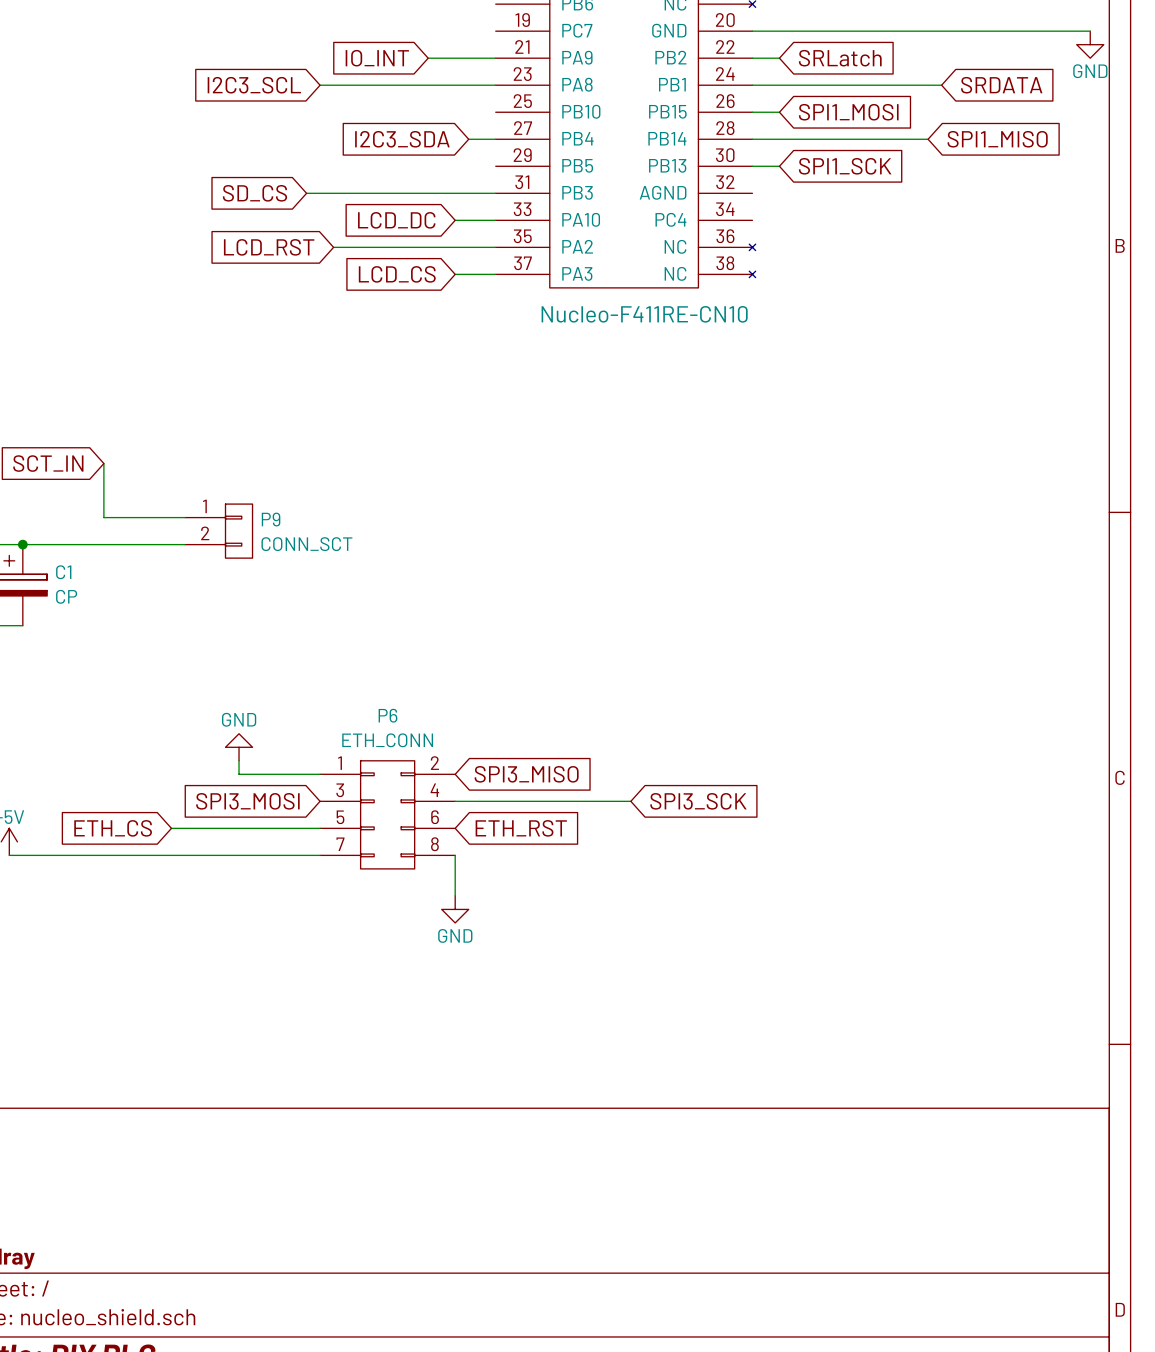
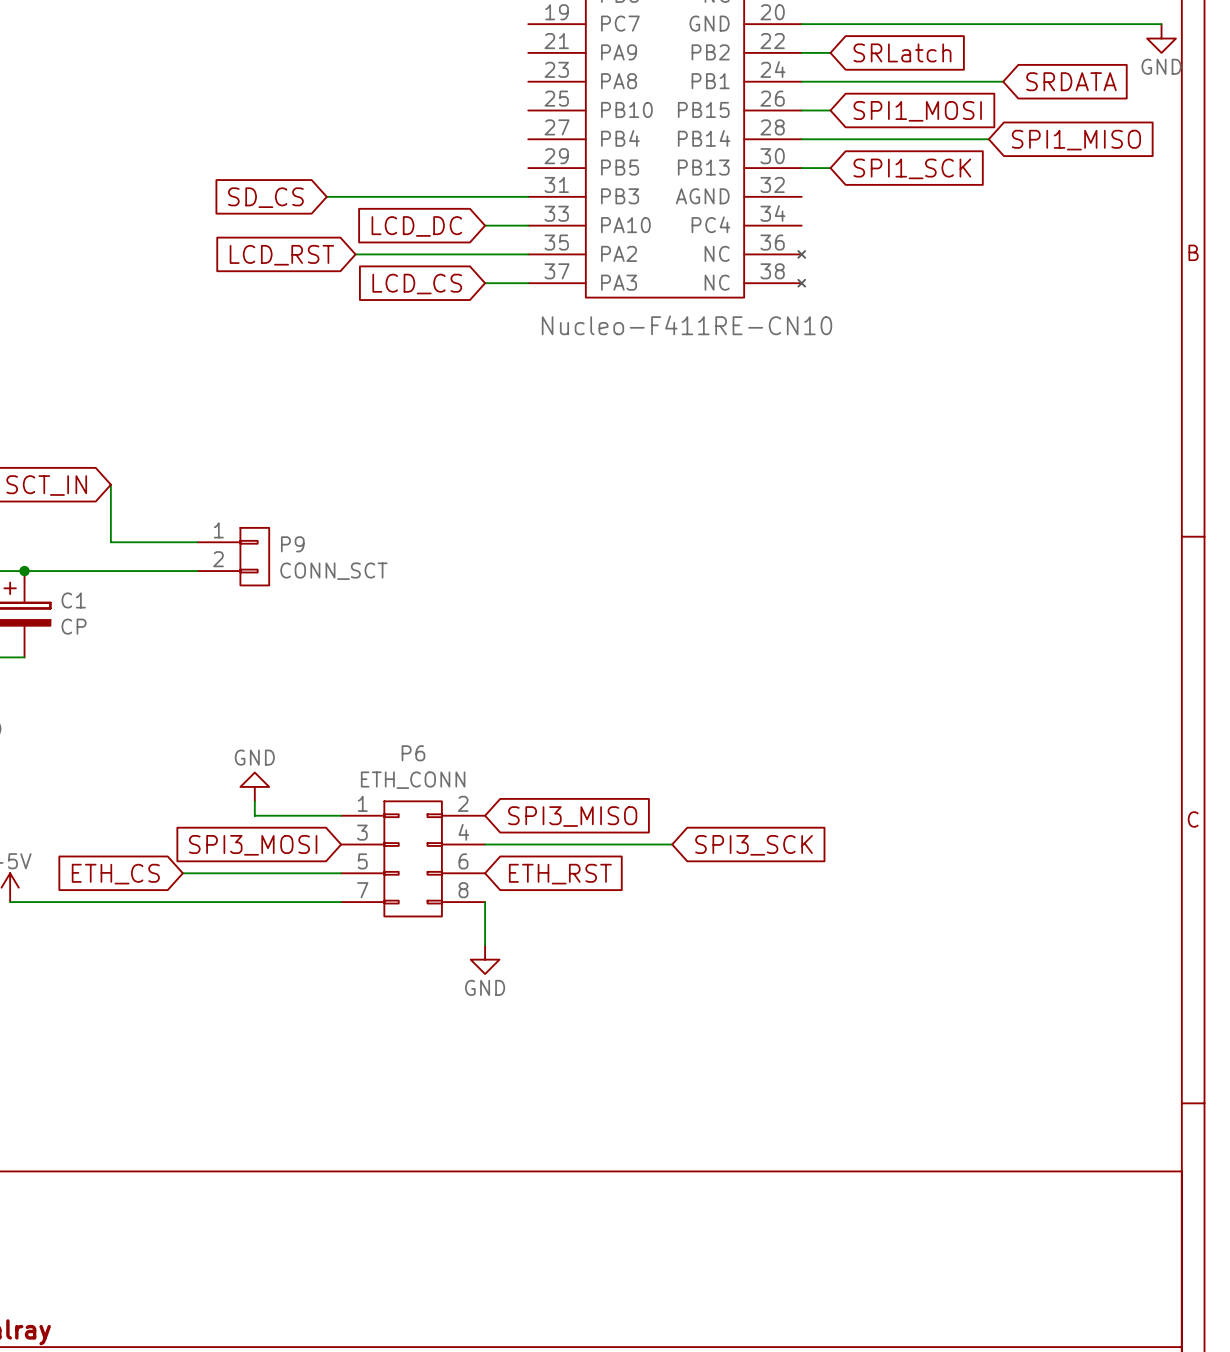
global label: IO_INT (377, 58) -> none
wire: (428, 58) (495, 58) -> none
global label: I2C3_SCL (254, 85) -> none
wire: (320, 85) (495, 85) -> none
global label: I2C3_SDA (402, 139) -> none
wire: (468, 139) (495, 139) -> none

